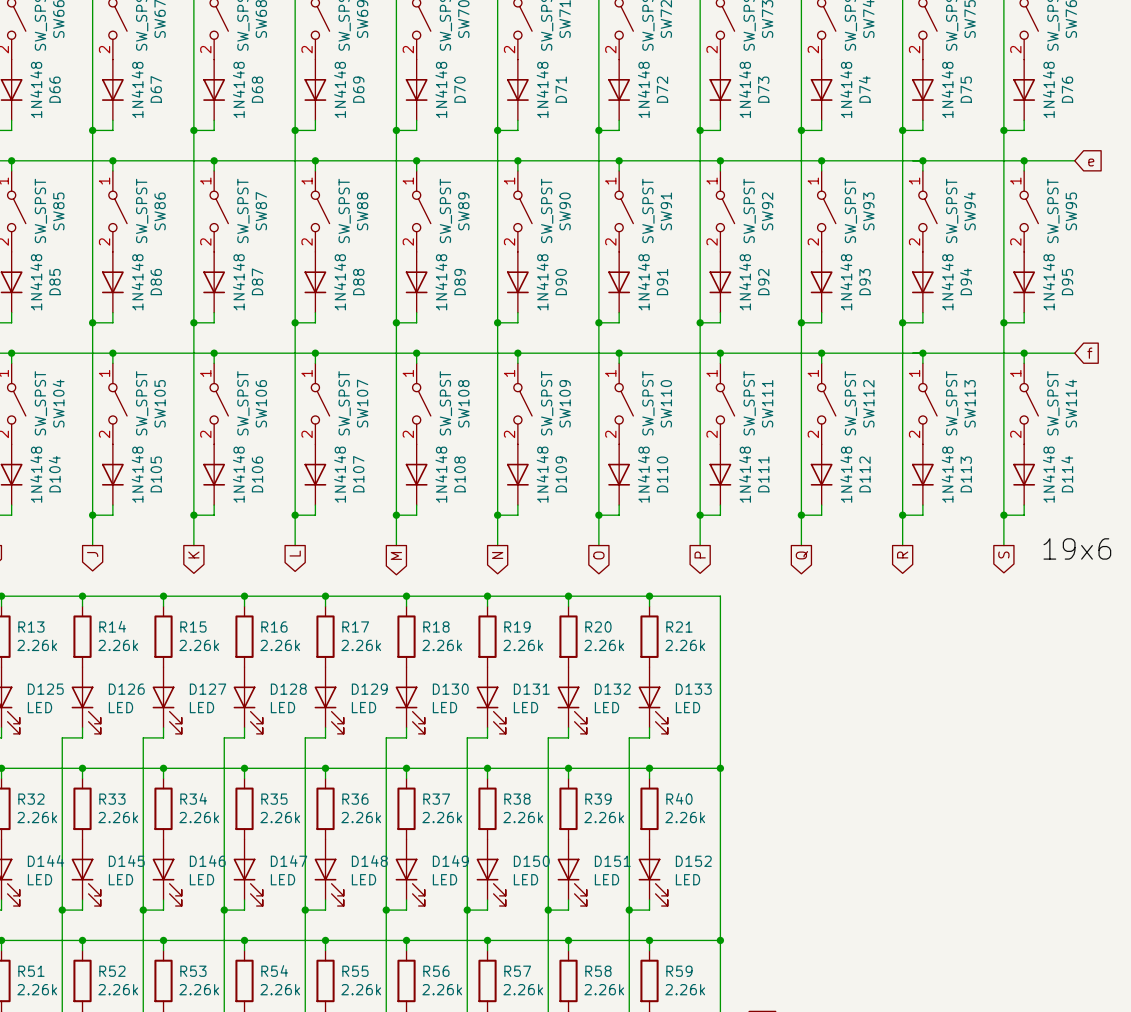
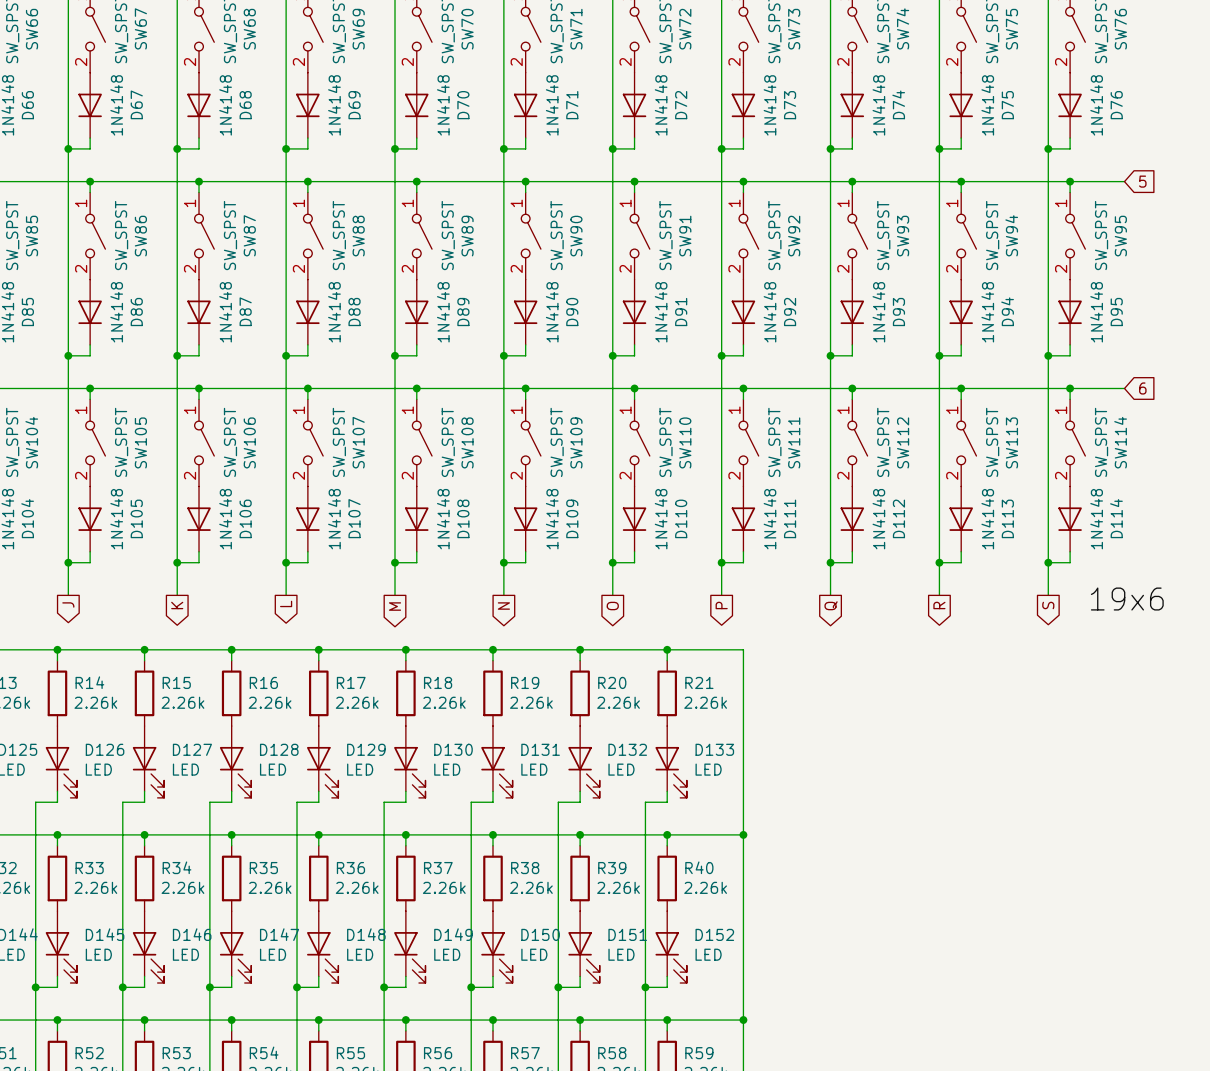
global label: e (1091, 162) -> 5 (1142, 181)
global label: f (1089, 353) -> 6 (1142, 388)

